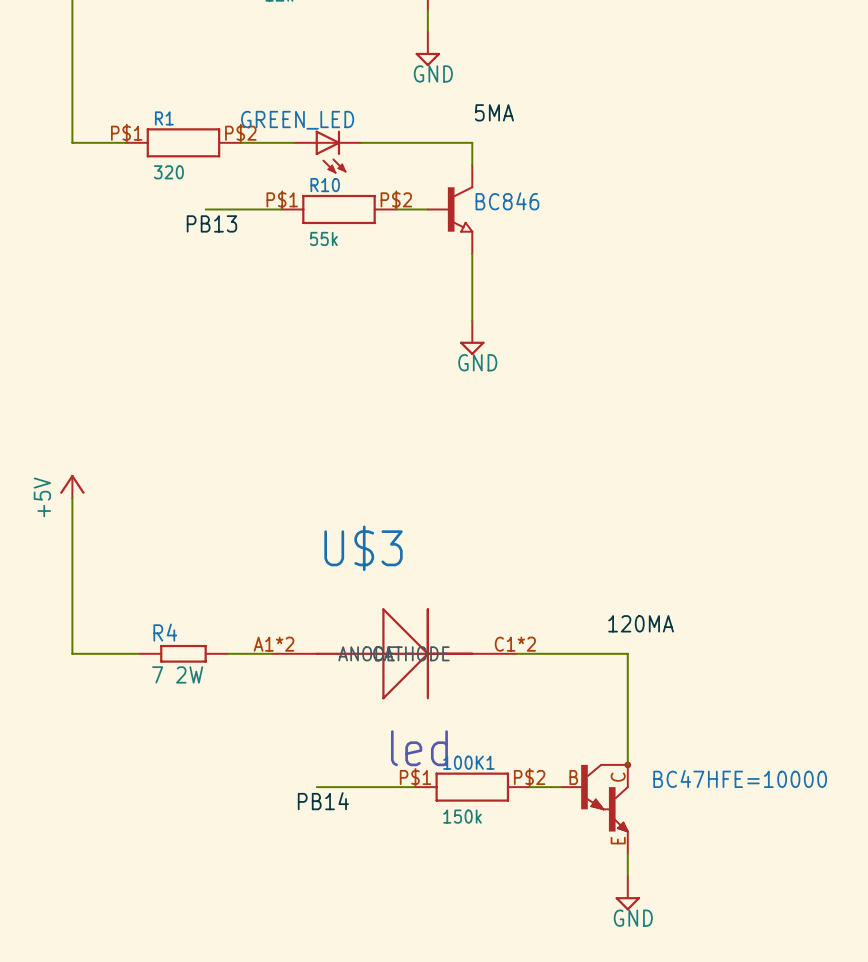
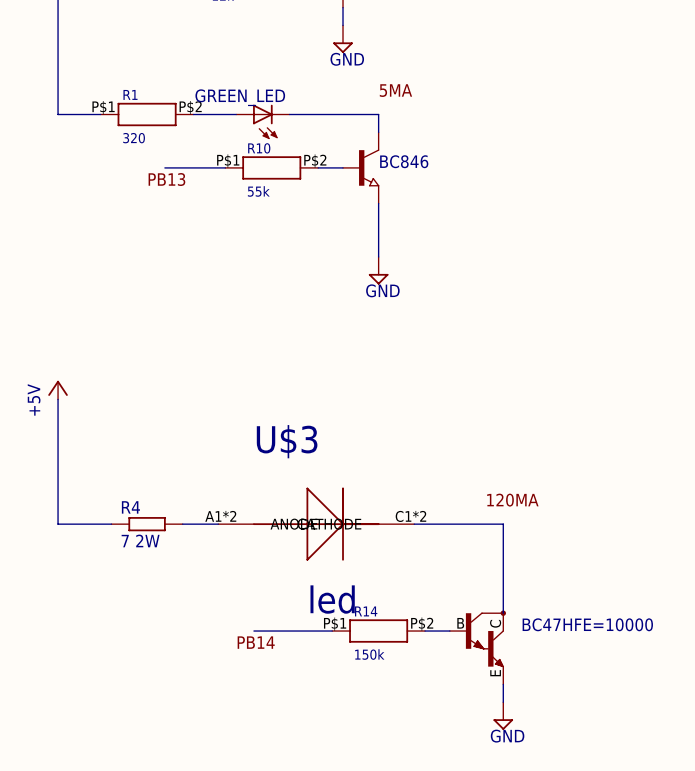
100K1 name: 100K1 (468, 762) -> R14 (366, 611)

